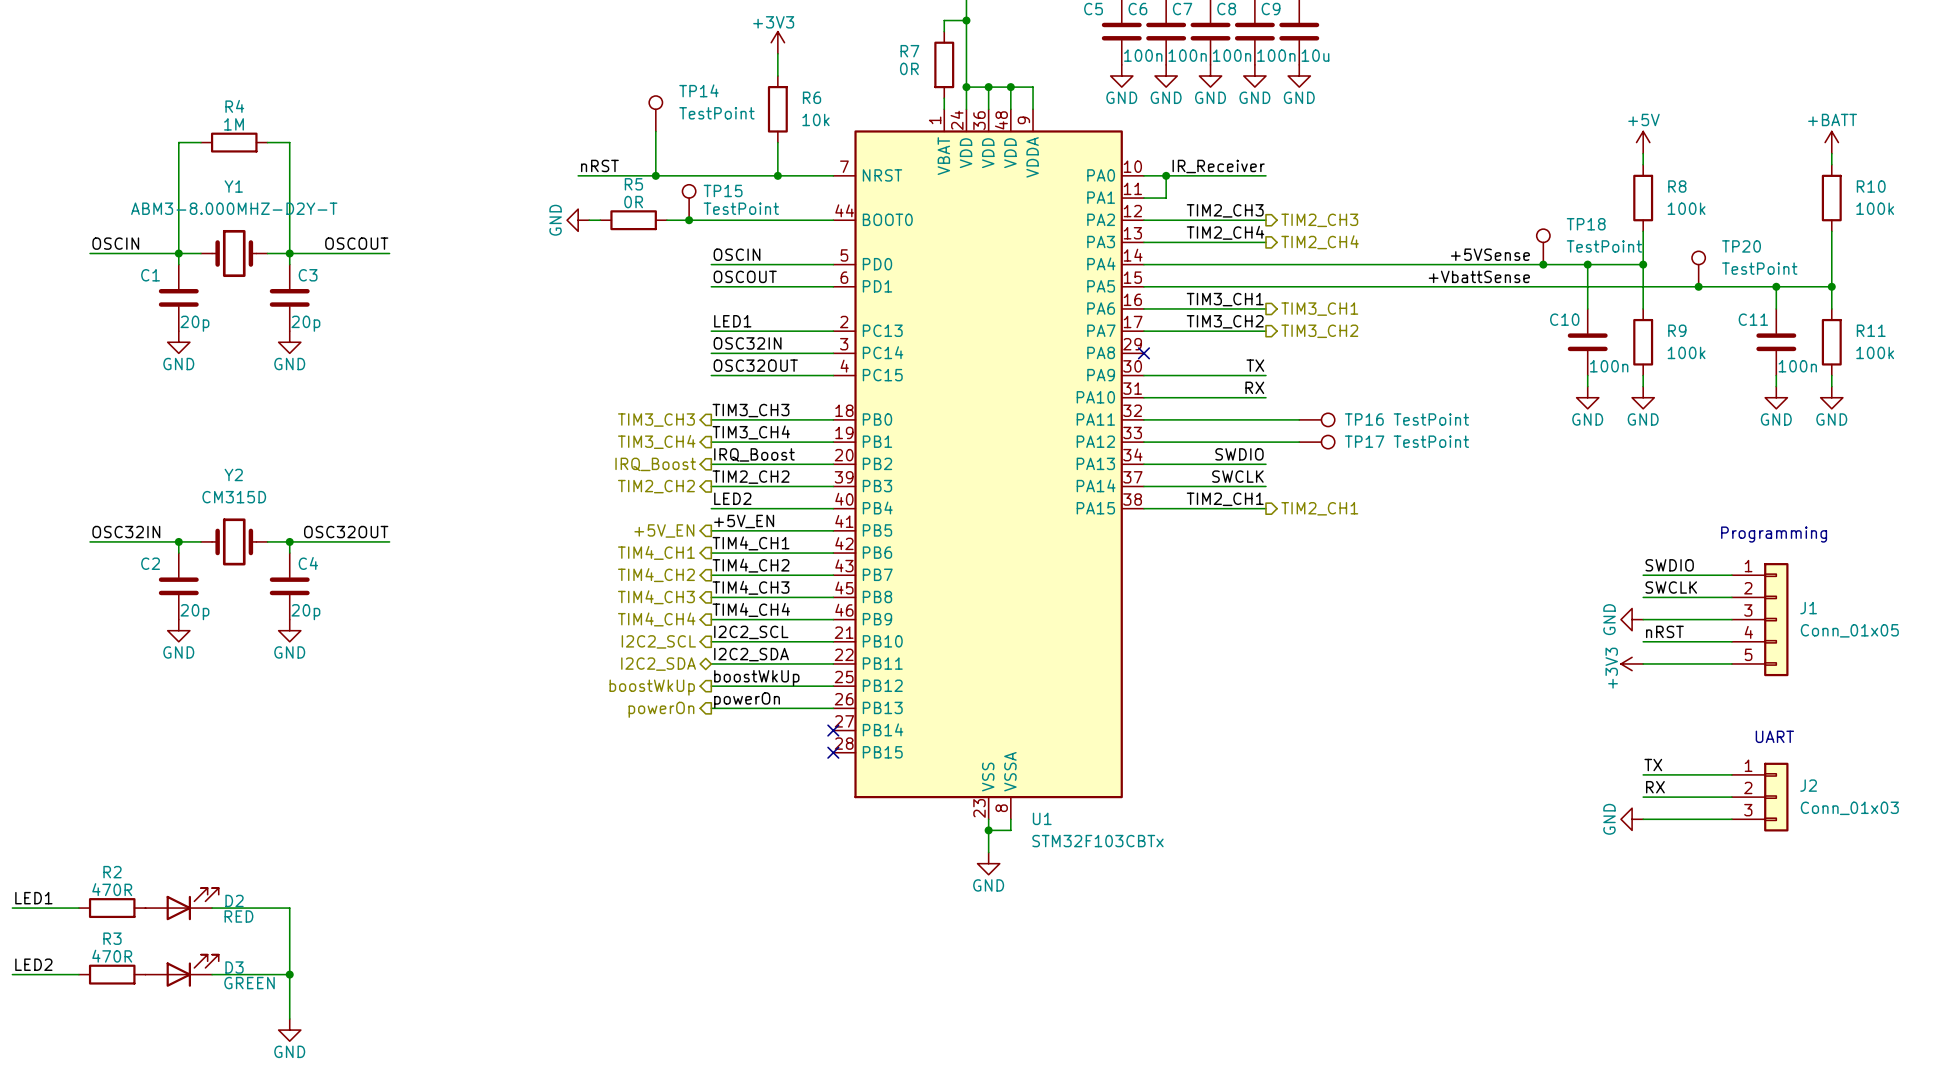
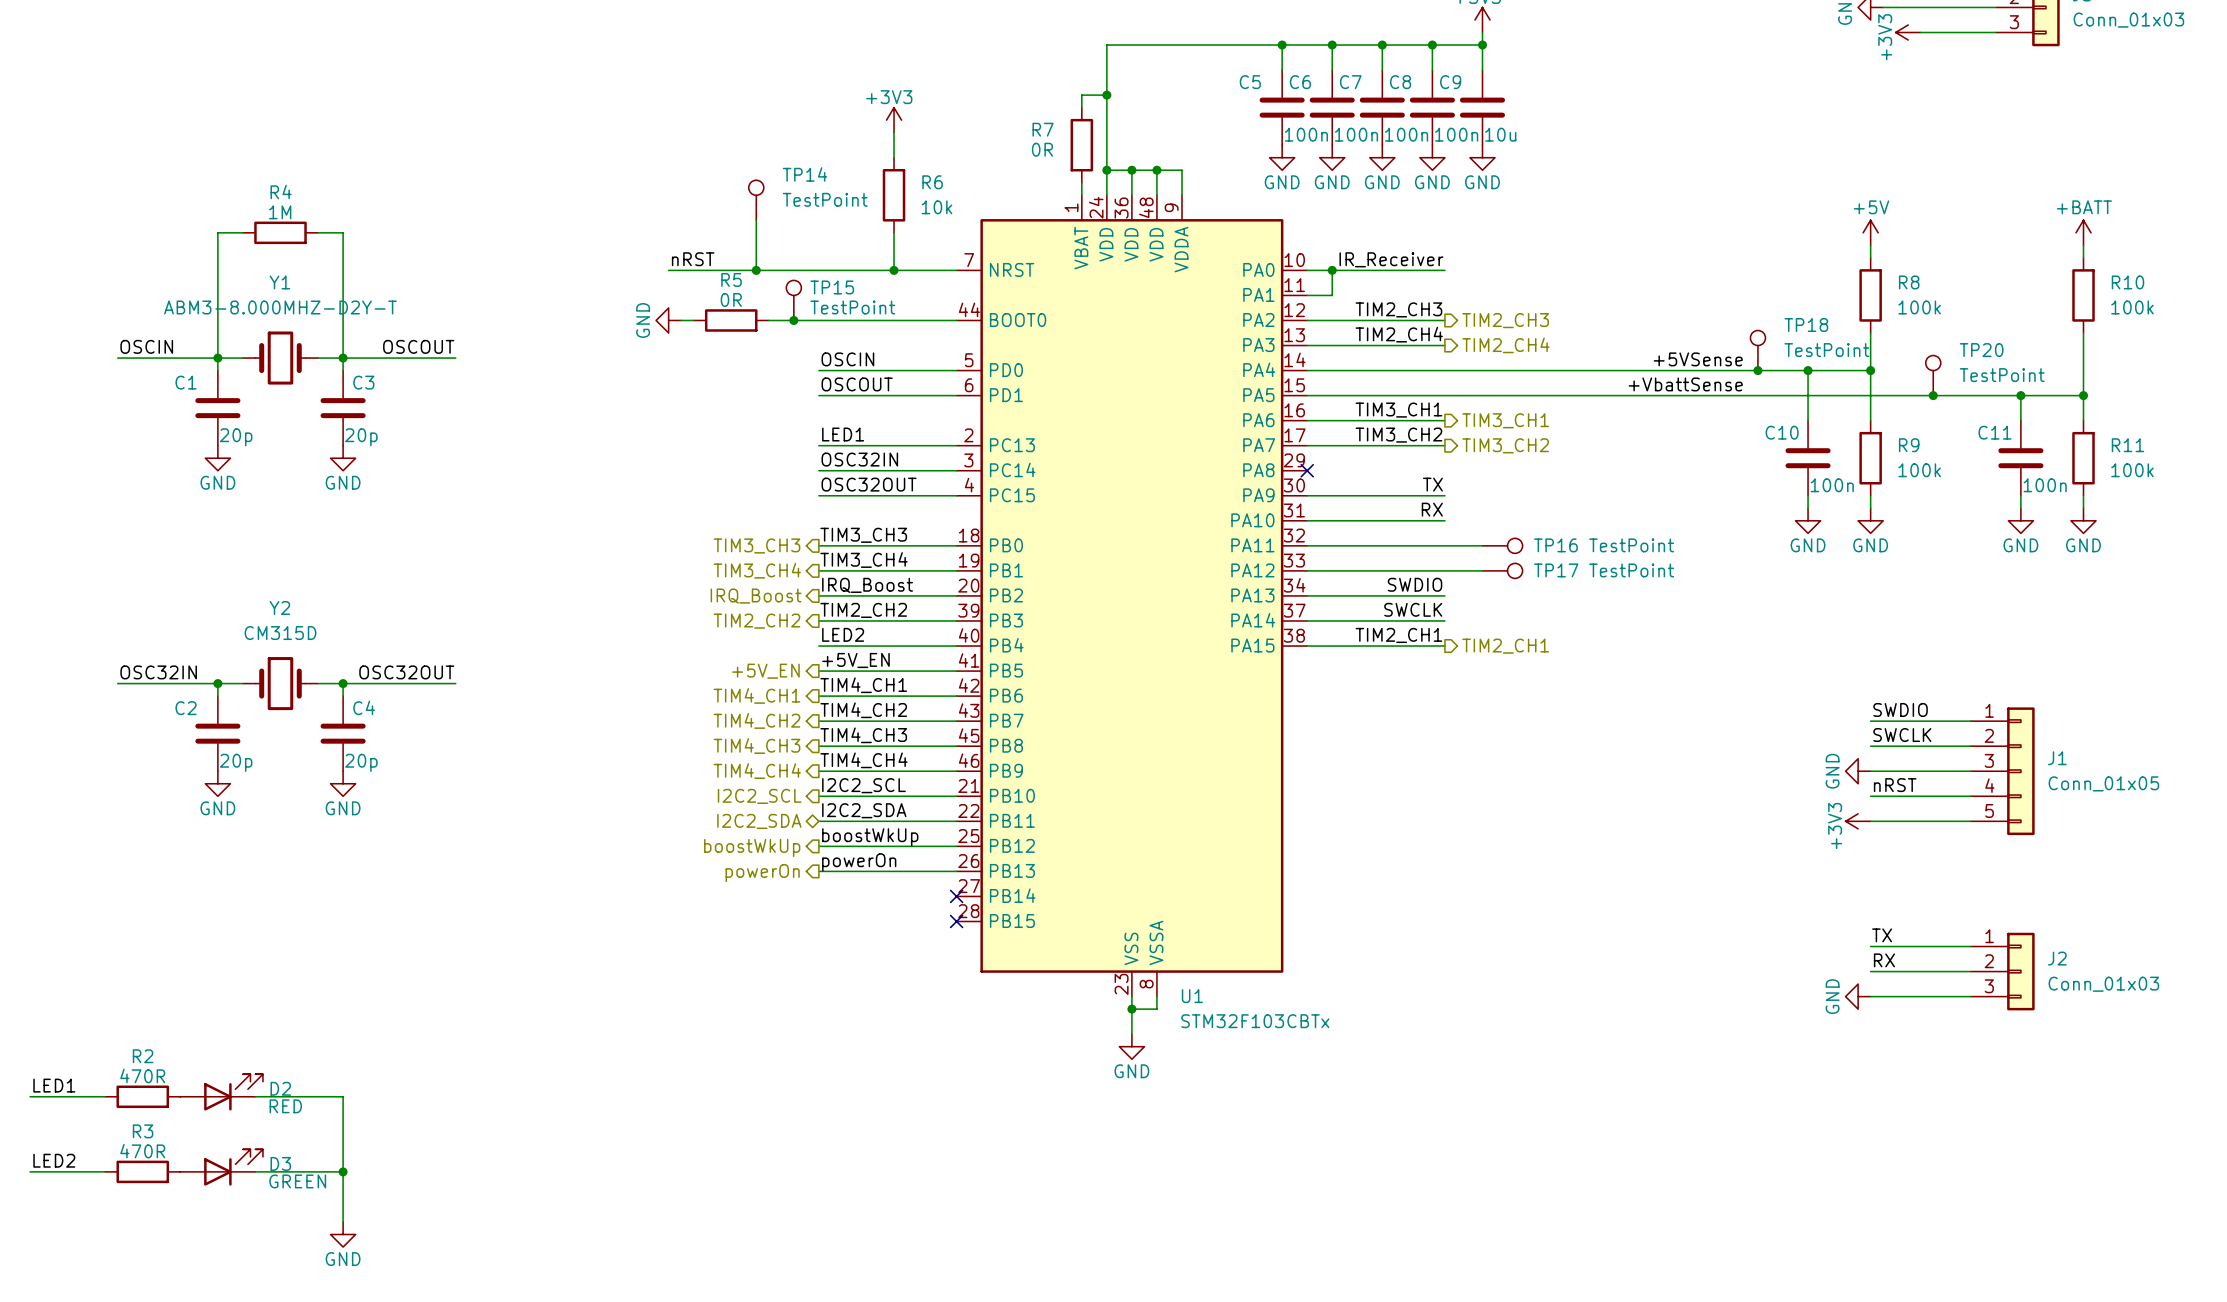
text: Programming (1774, 534) -> none
text: UART (1774, 736) -> none

